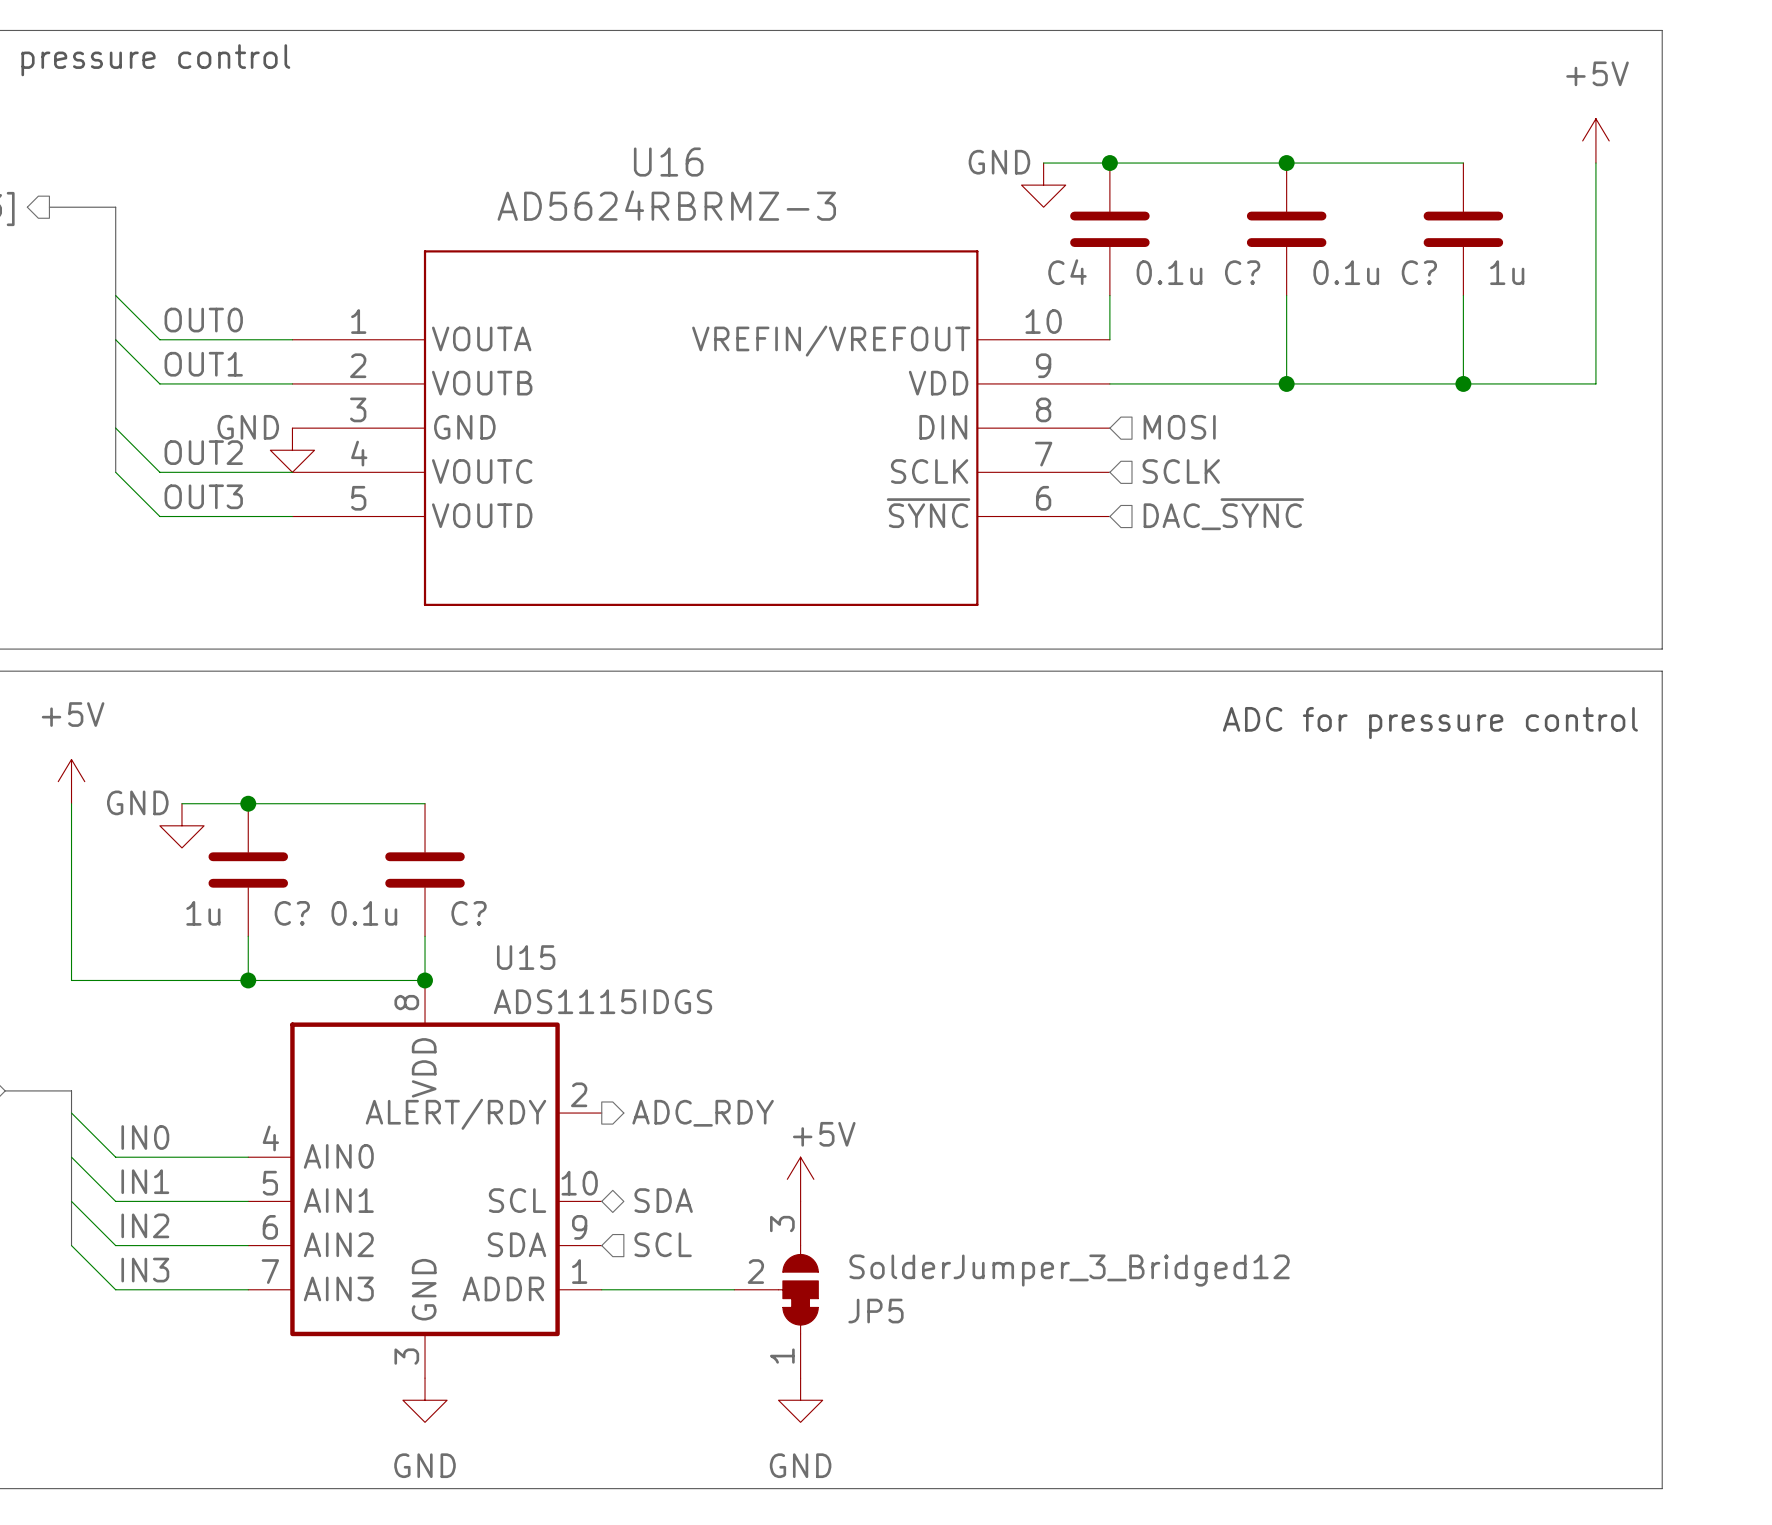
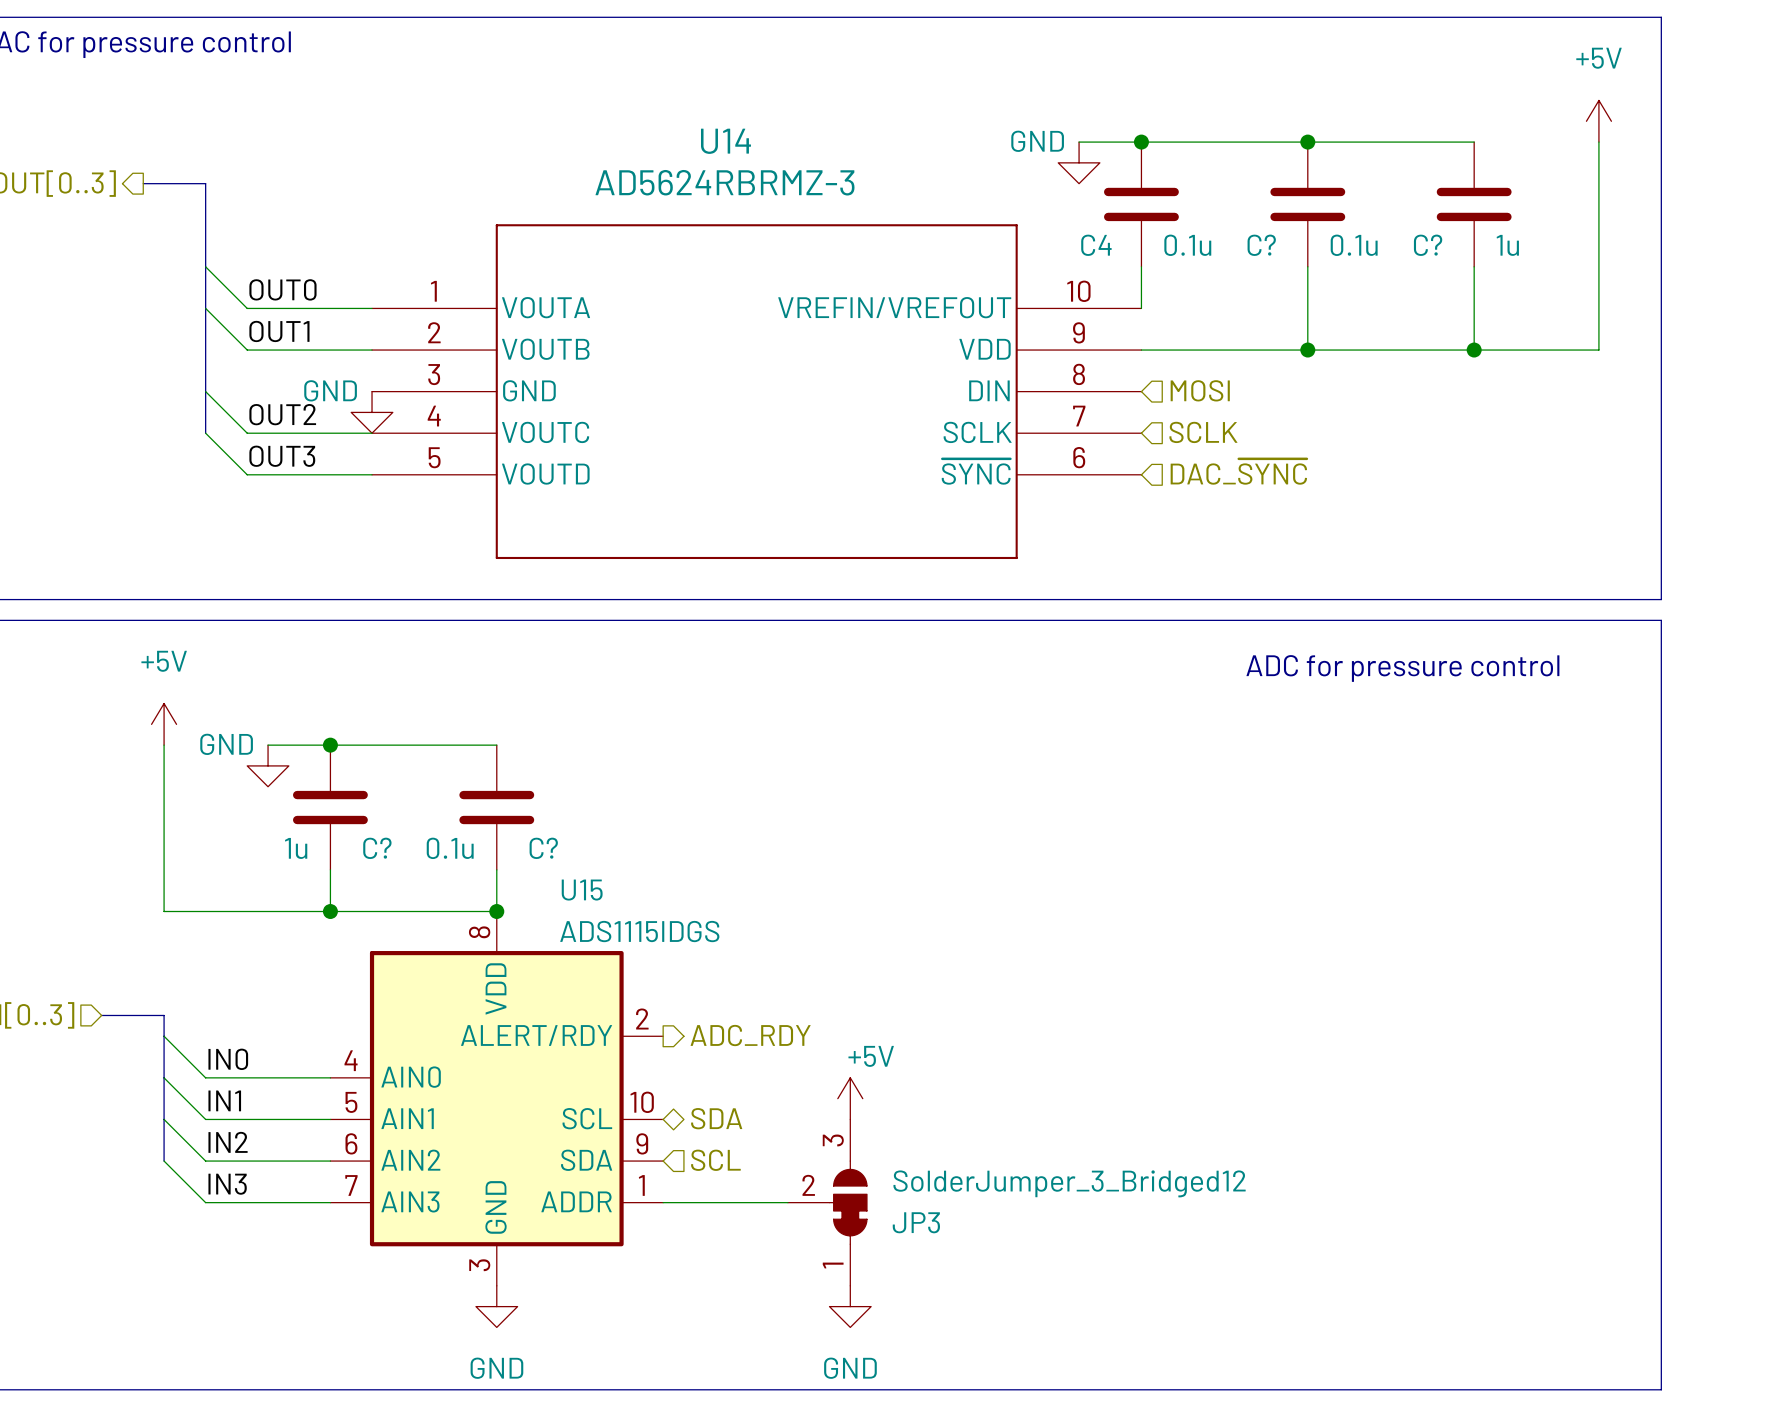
U16 name: U16 (668, 162) -> U14 (725, 141)
JP5 name: JP5 (875, 1311) -> JP3 (916, 1222)

